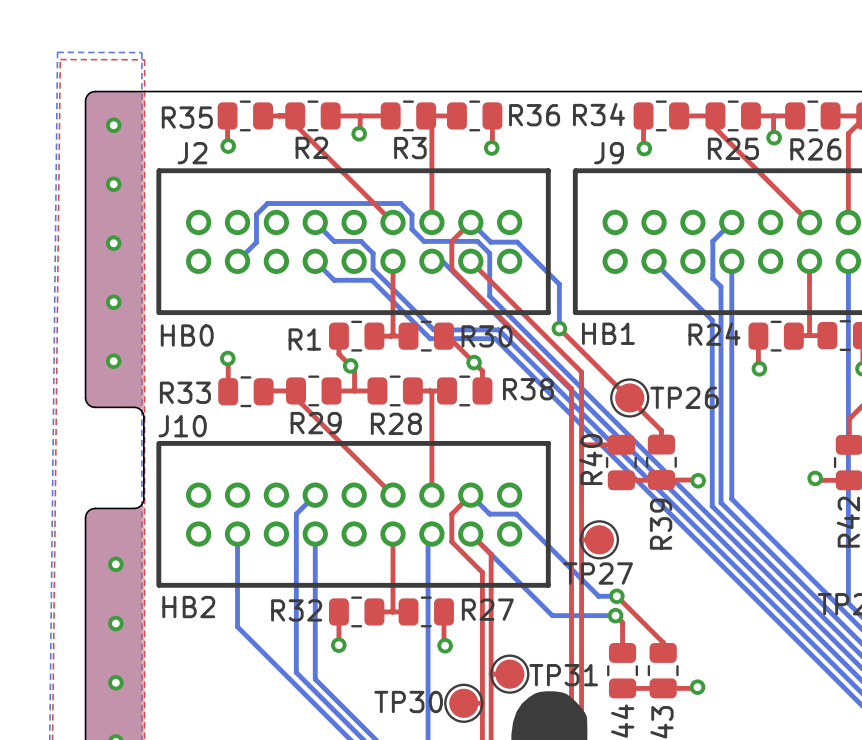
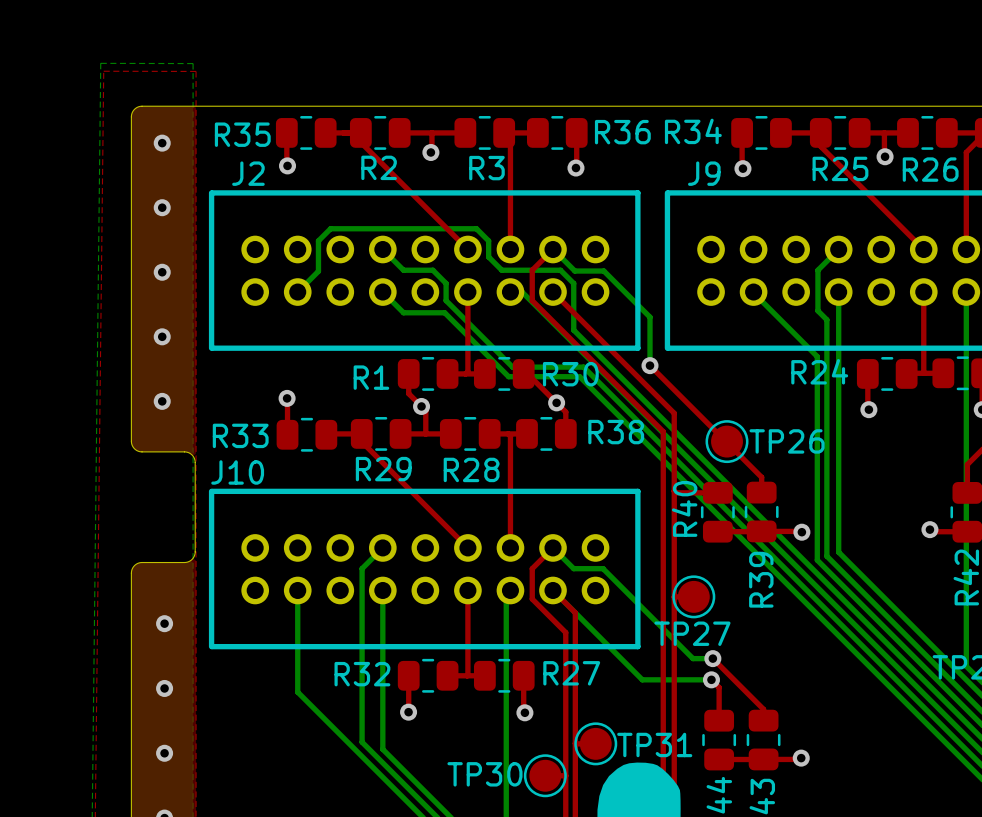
text: HB1 (608, 333) -> none
text: HB0 (187, 335) -> none
text: HB2 (188, 607) -> none

